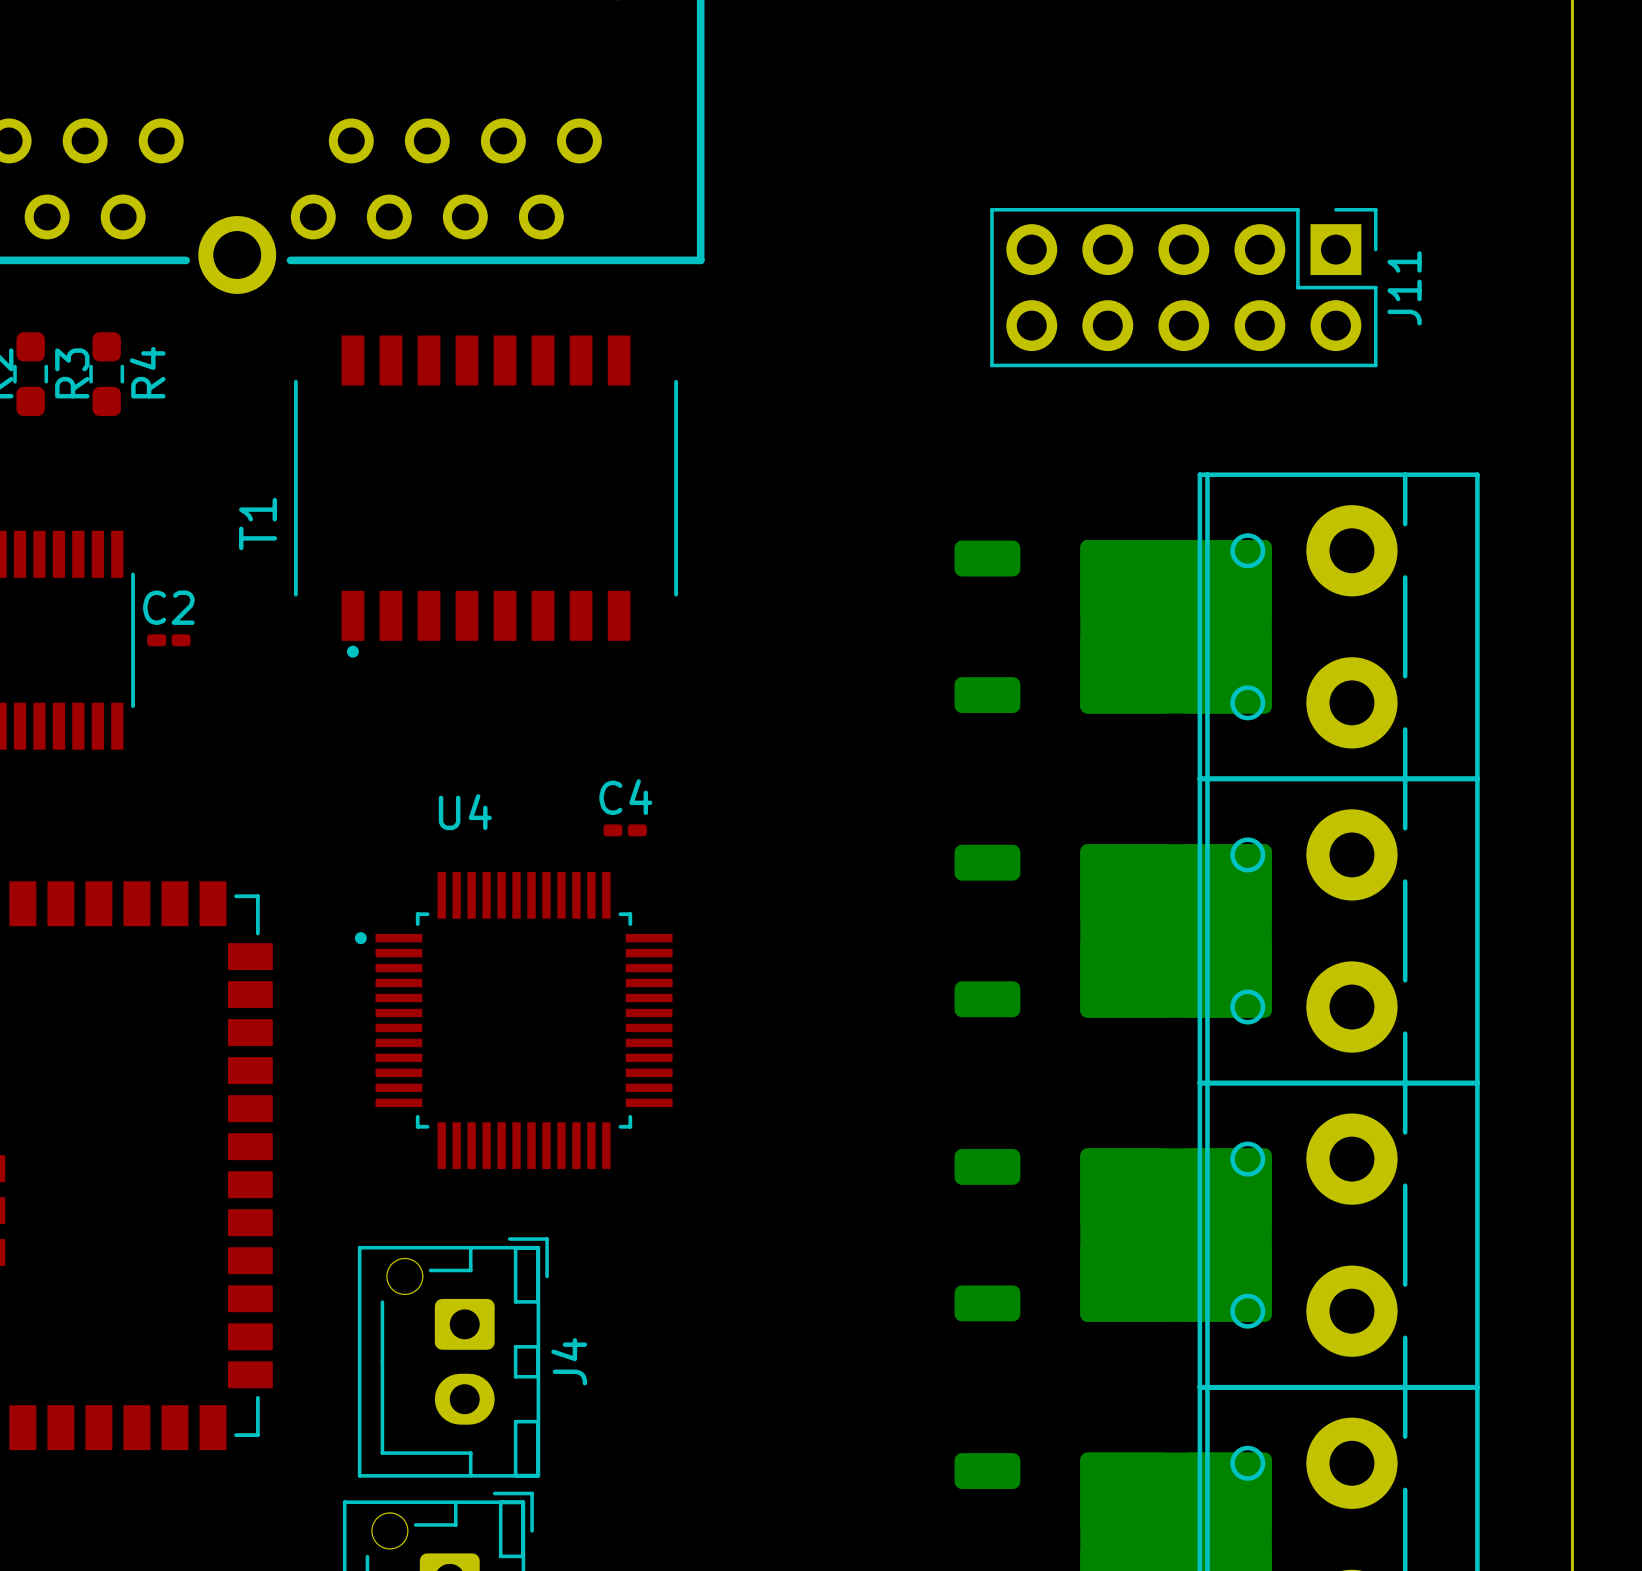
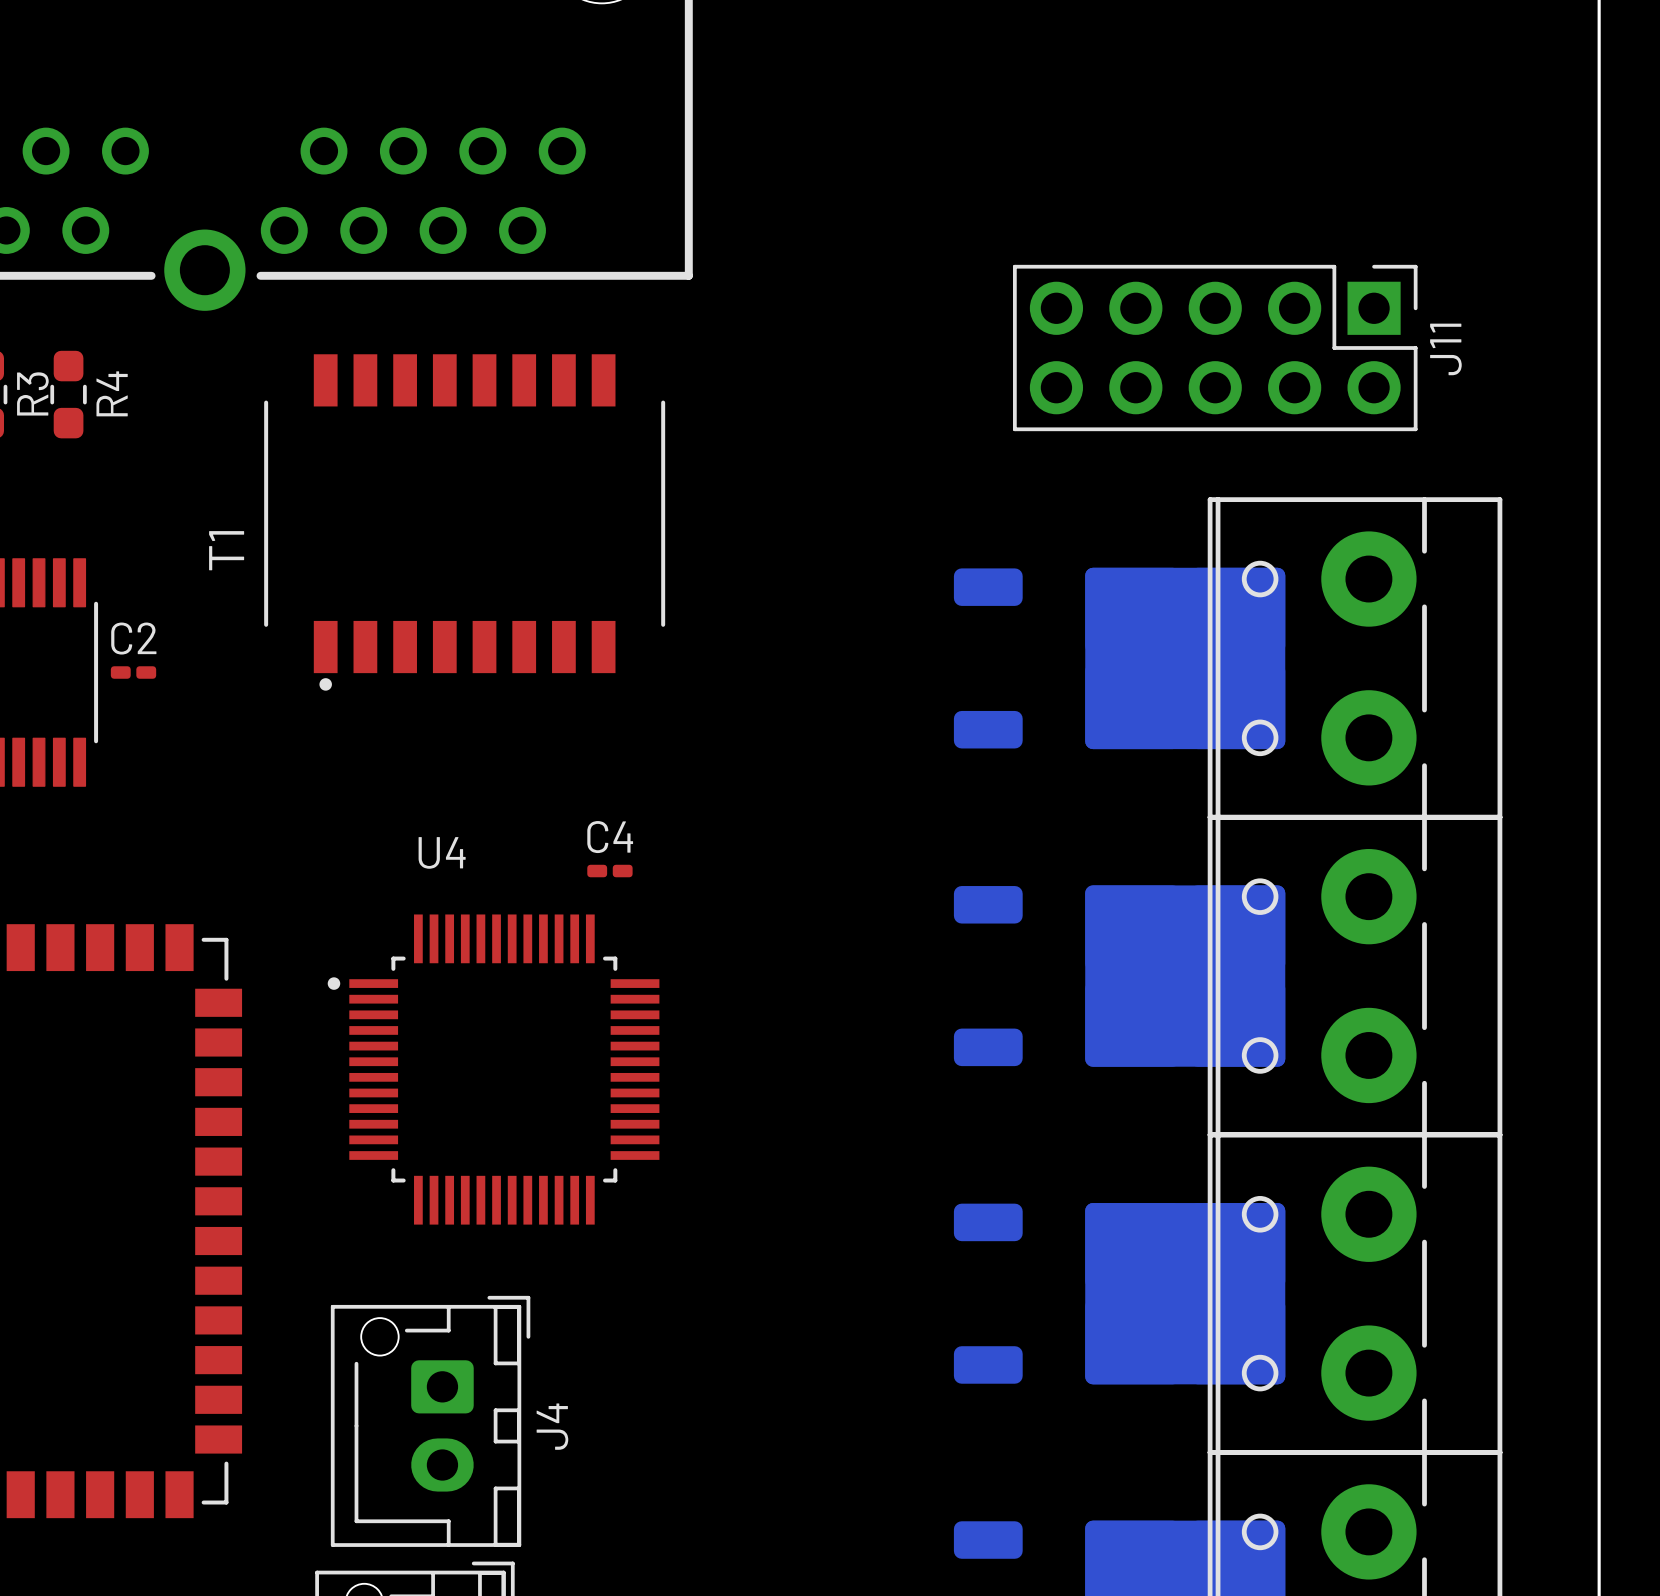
J11 position: (1183, 287) -> (1215, 348)

